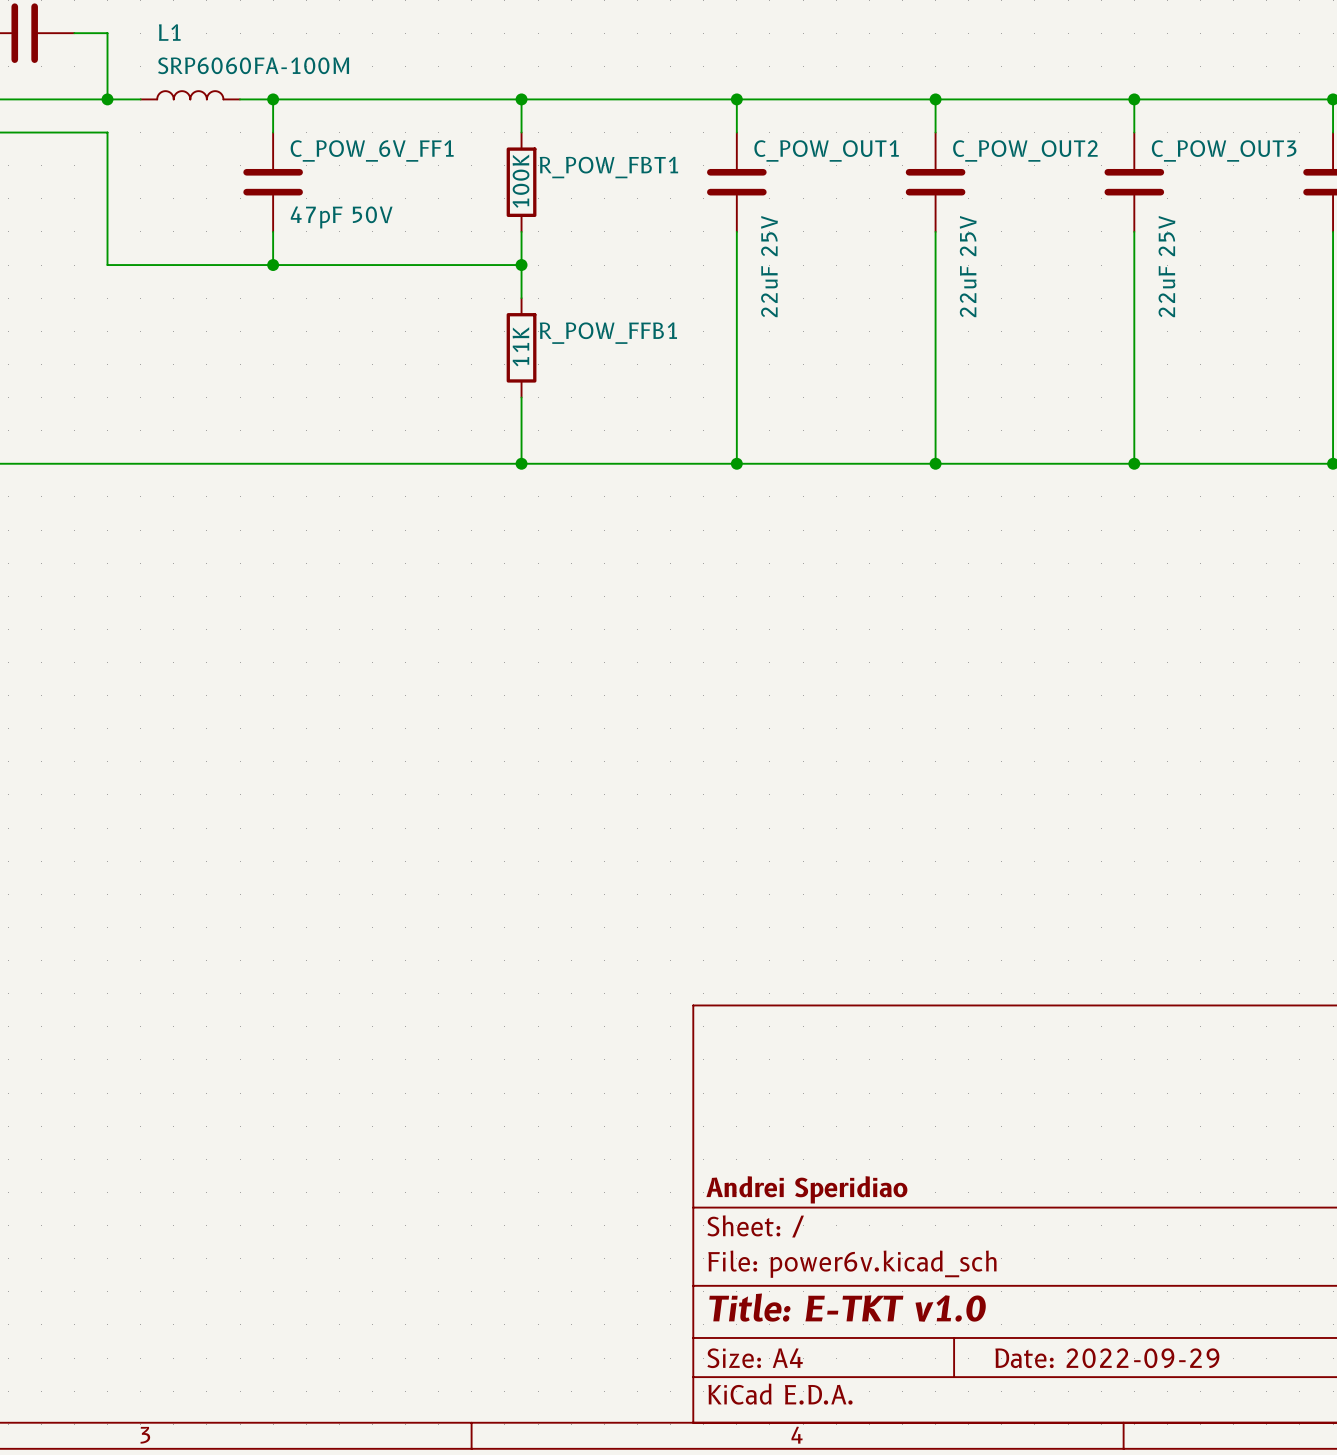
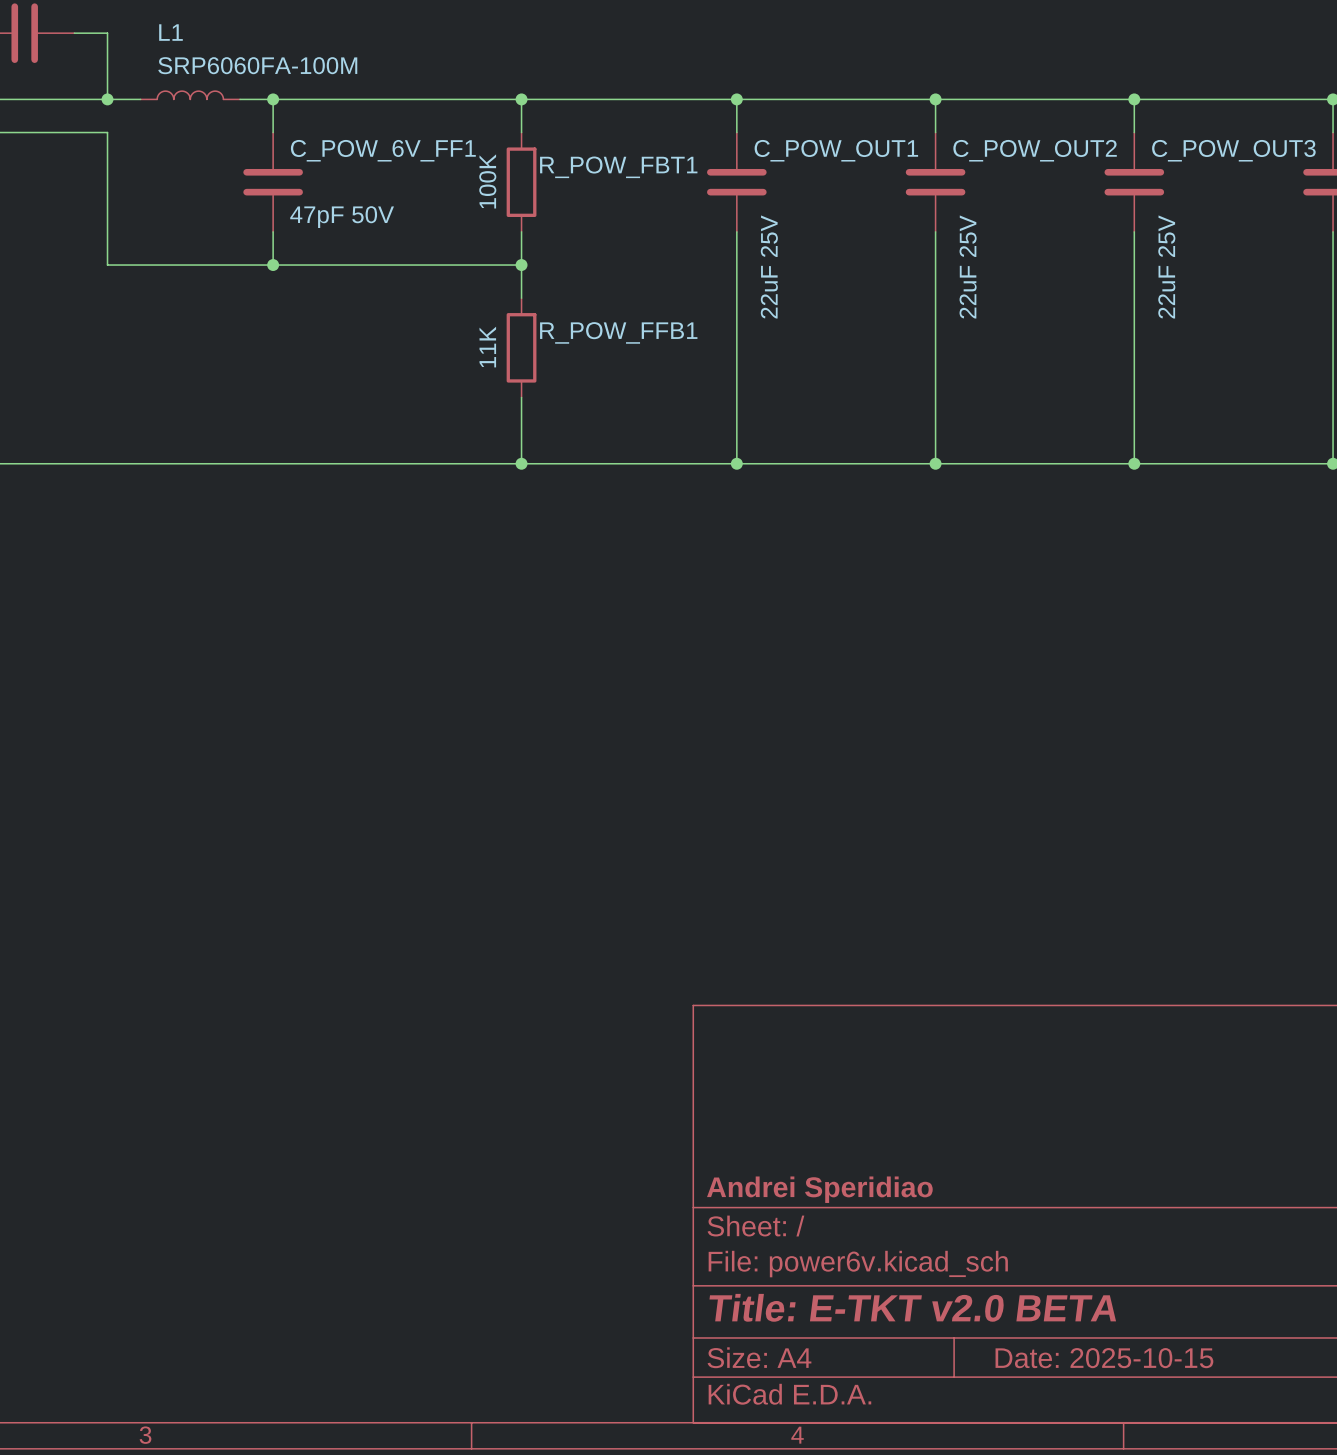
R_POW_FBT1 value position: 100K (521, 181) -> 100K (487, 181)
R_POW_FFB1 value position: 11K (520, 346) -> 11K (487, 347)
title block: Title: E-TKT v1.0 (847, 1307) -> Title: E-TKT v2.0 BETA (912, 1307)
title block: Date: 2022-09-29 (1107, 1358) -> Date: 2025-10-15 (1104, 1358)

